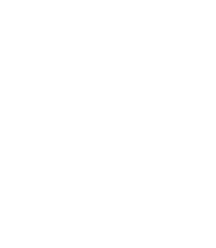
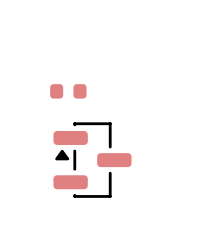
part: none -> (68, 91)
part: none -> (92, 160)

